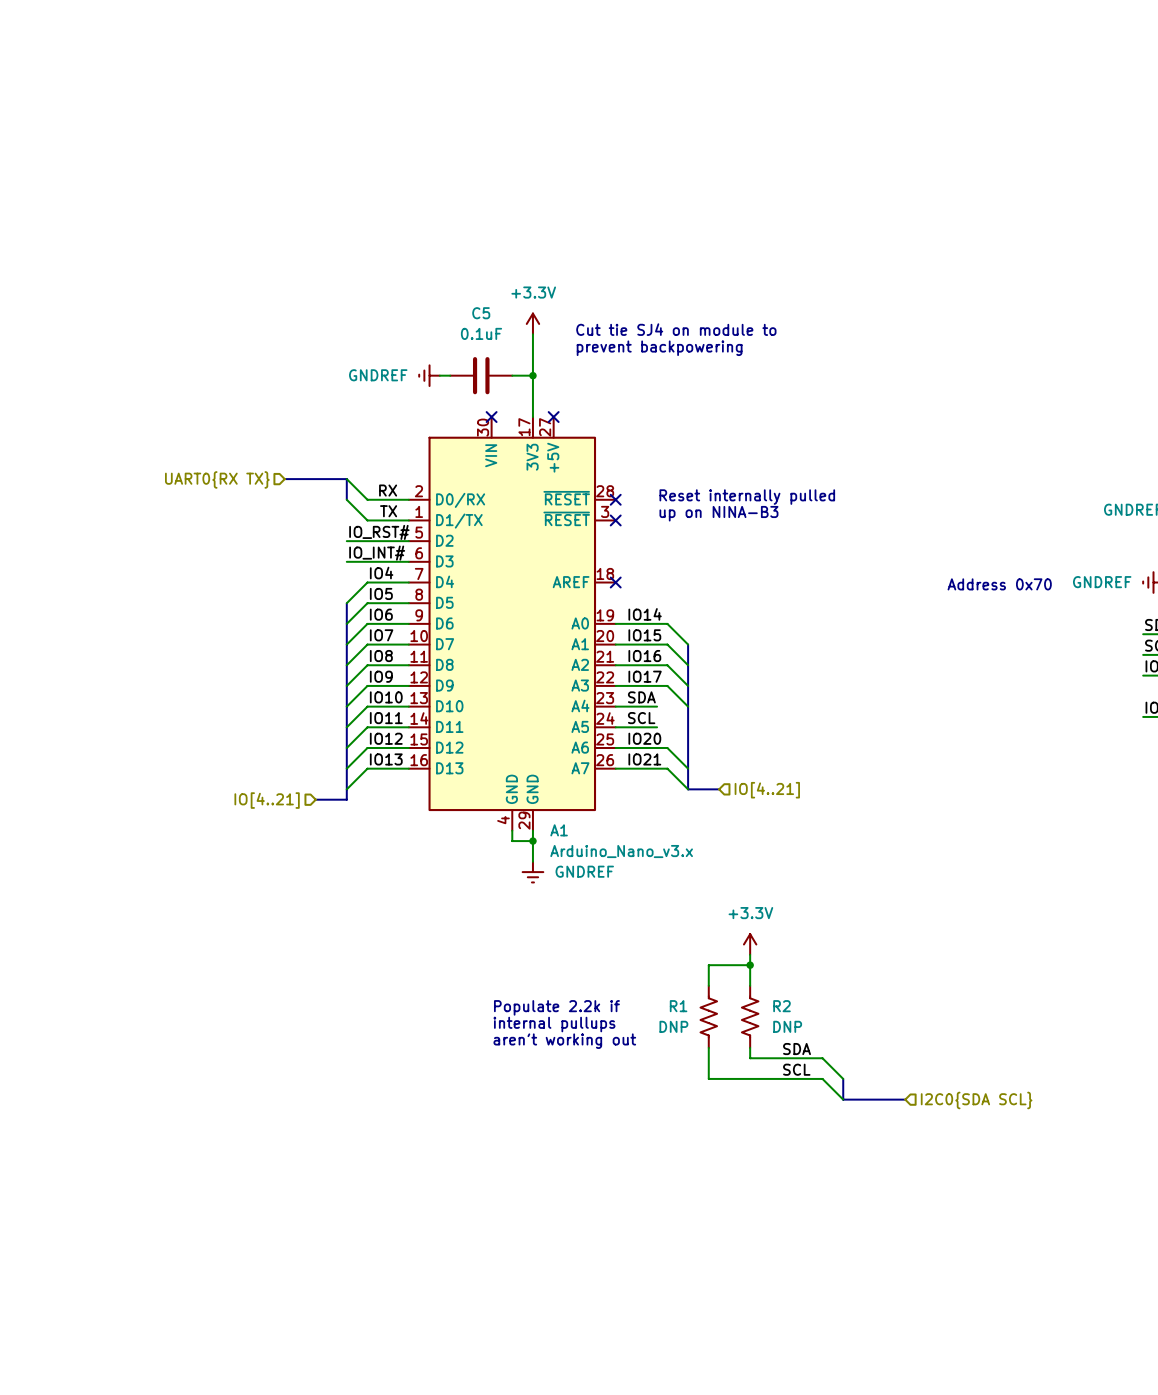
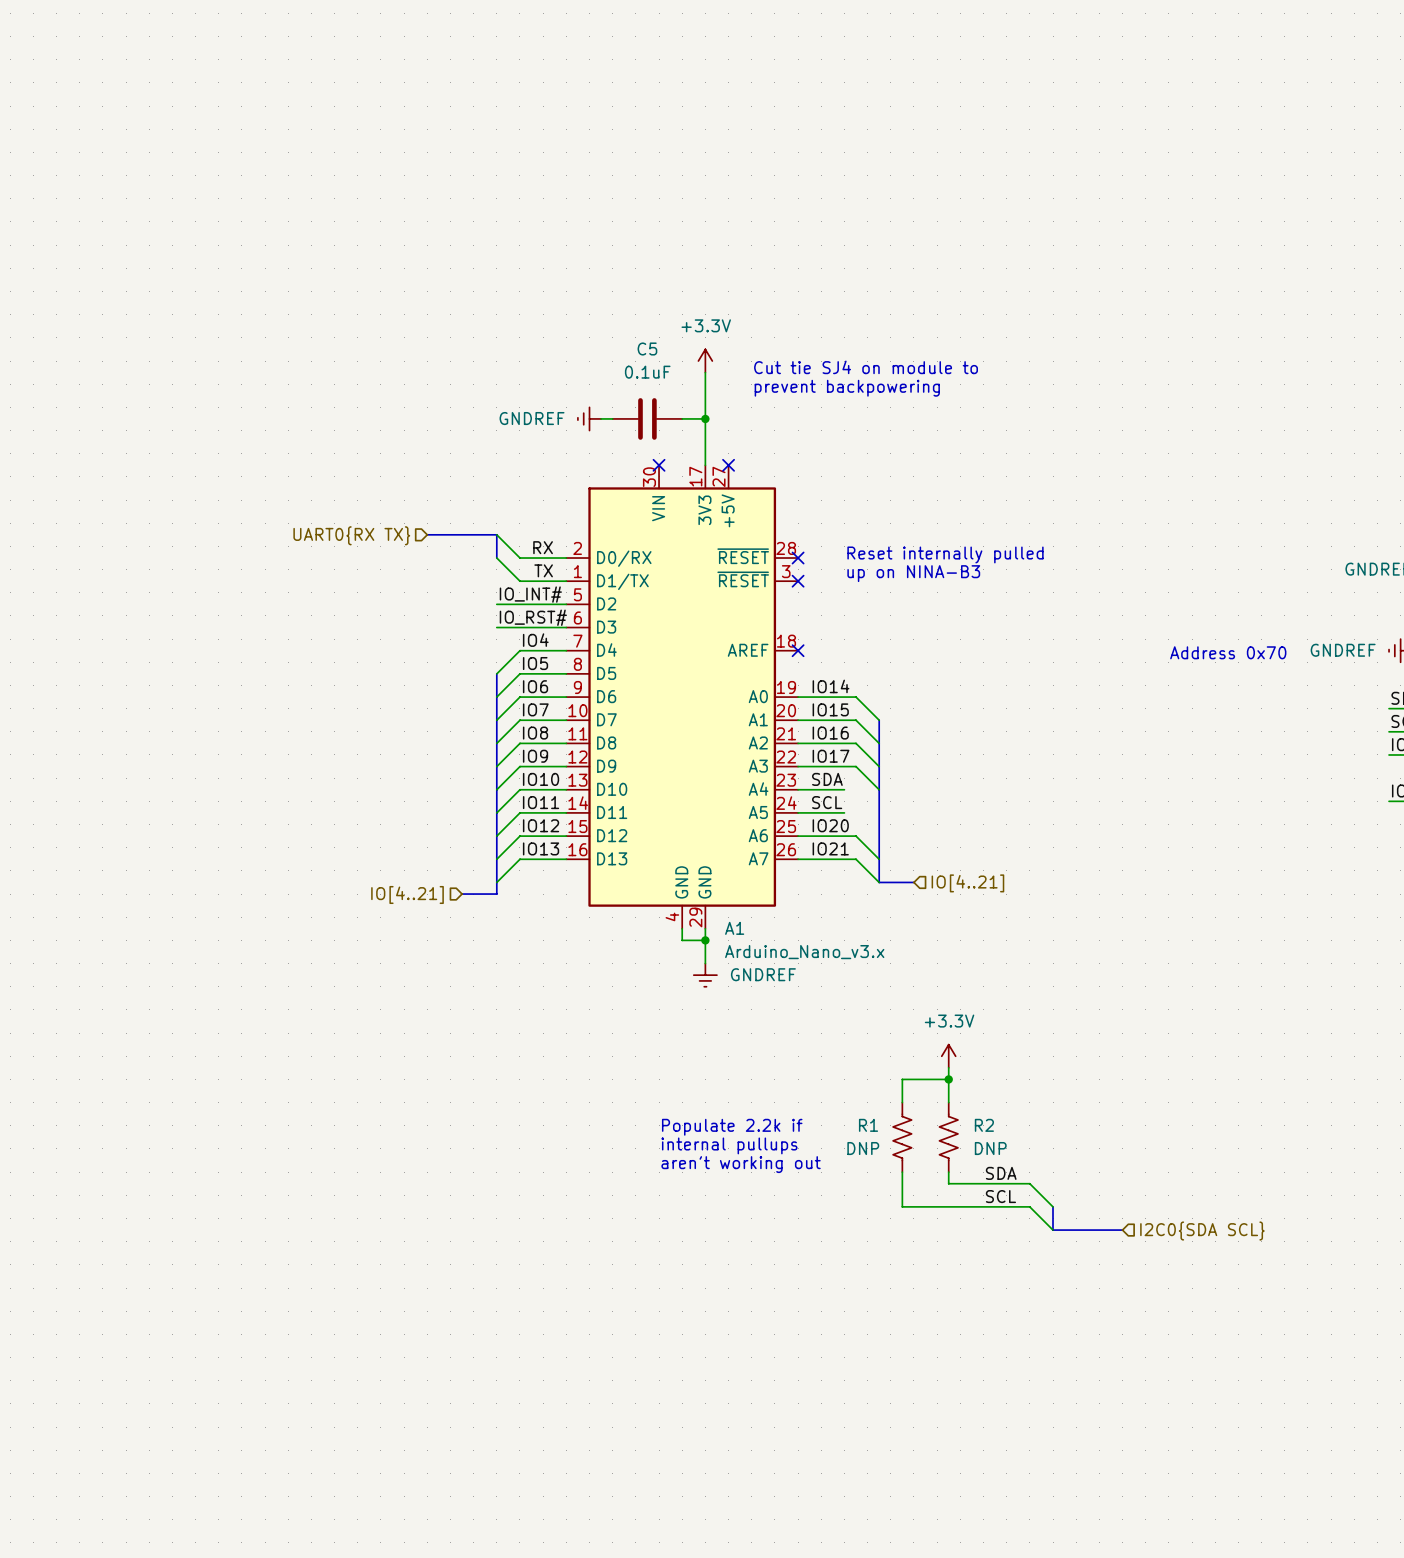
label: IO_RST# (379, 532) -> IO_INT# (530, 594)
label: IO_INT# (377, 553) -> IO_RST# (533, 617)

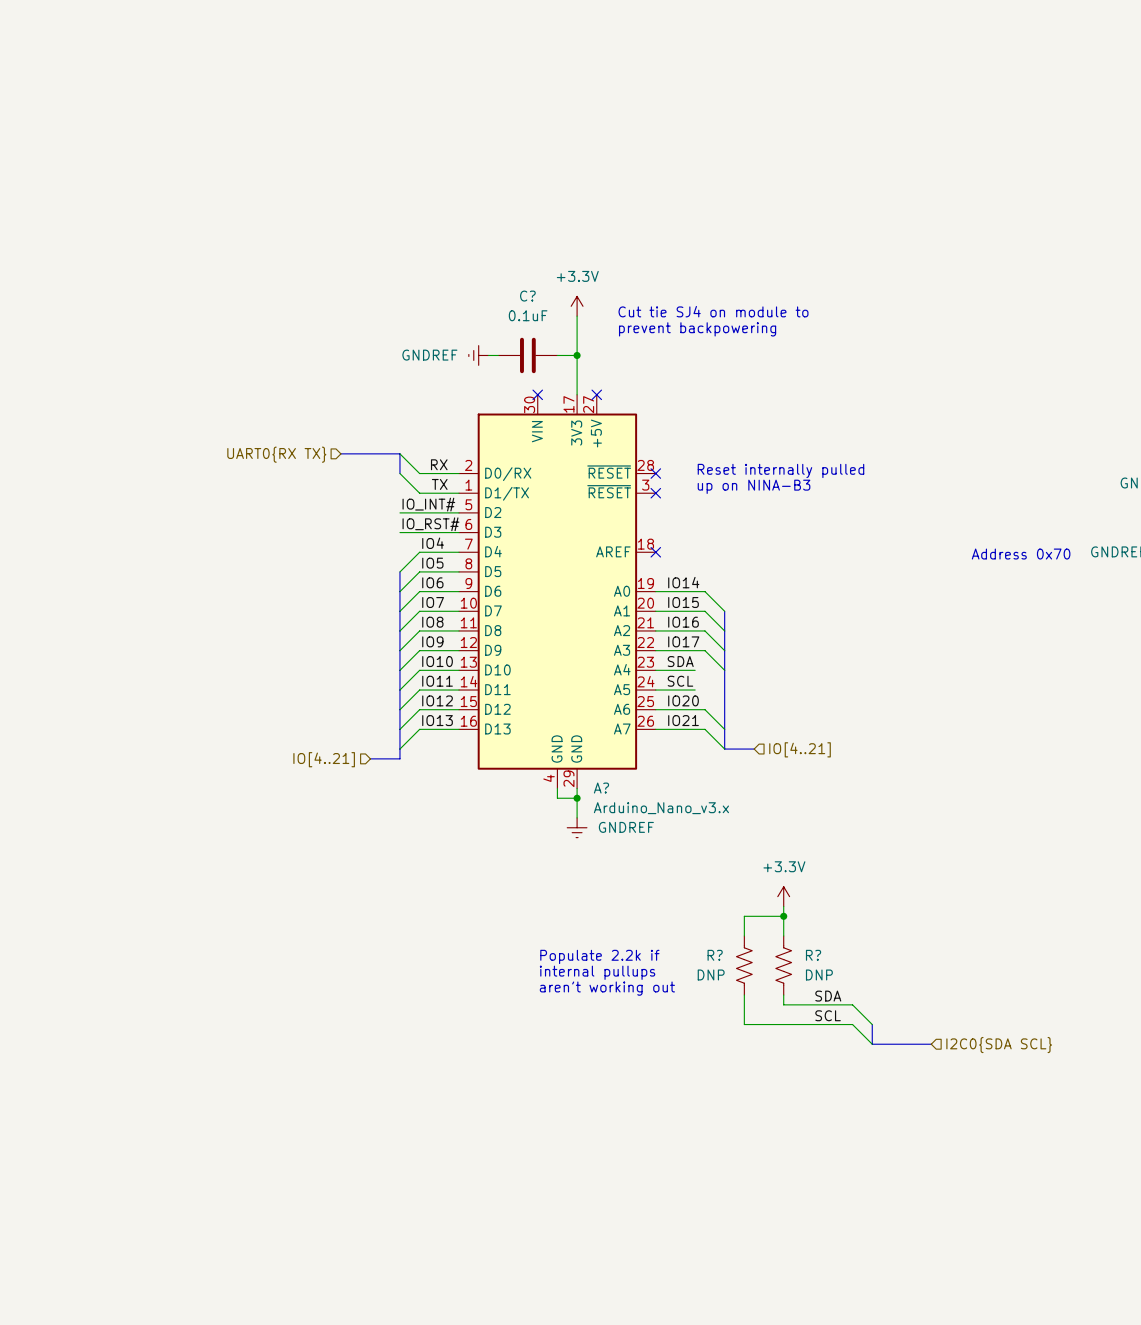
C5 name: C5 (647, 349) -> C? (527, 296)
A1 name: A1 (734, 928) -> A? (601, 788)
R1 name: R1 (868, 1125) -> R? (715, 955)
R2 name: R2 (984, 1125) -> R? (813, 955)

